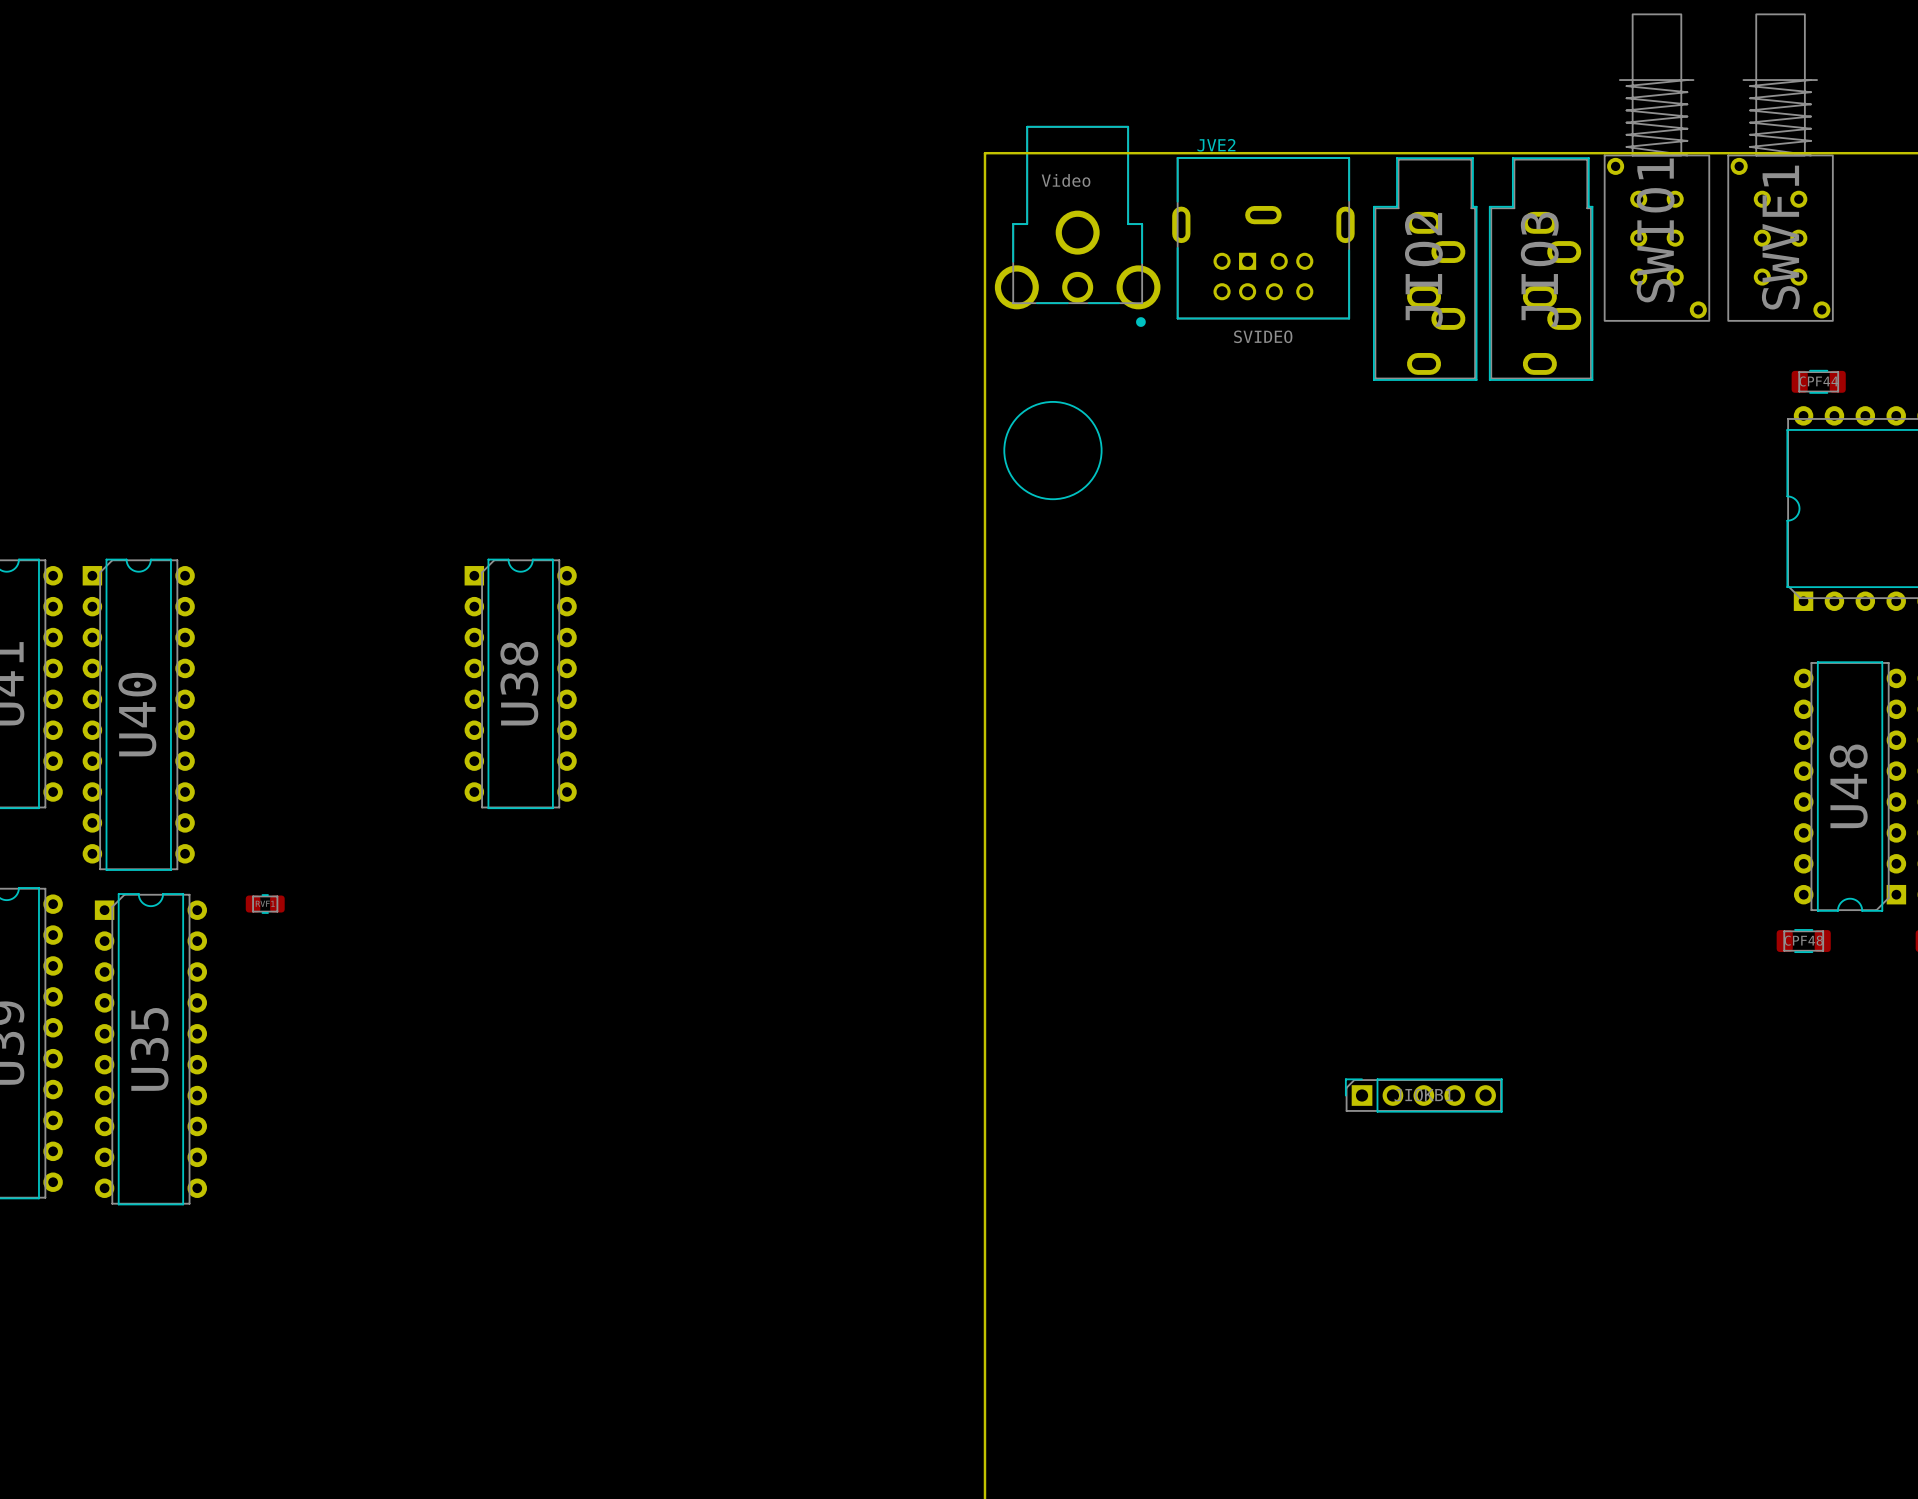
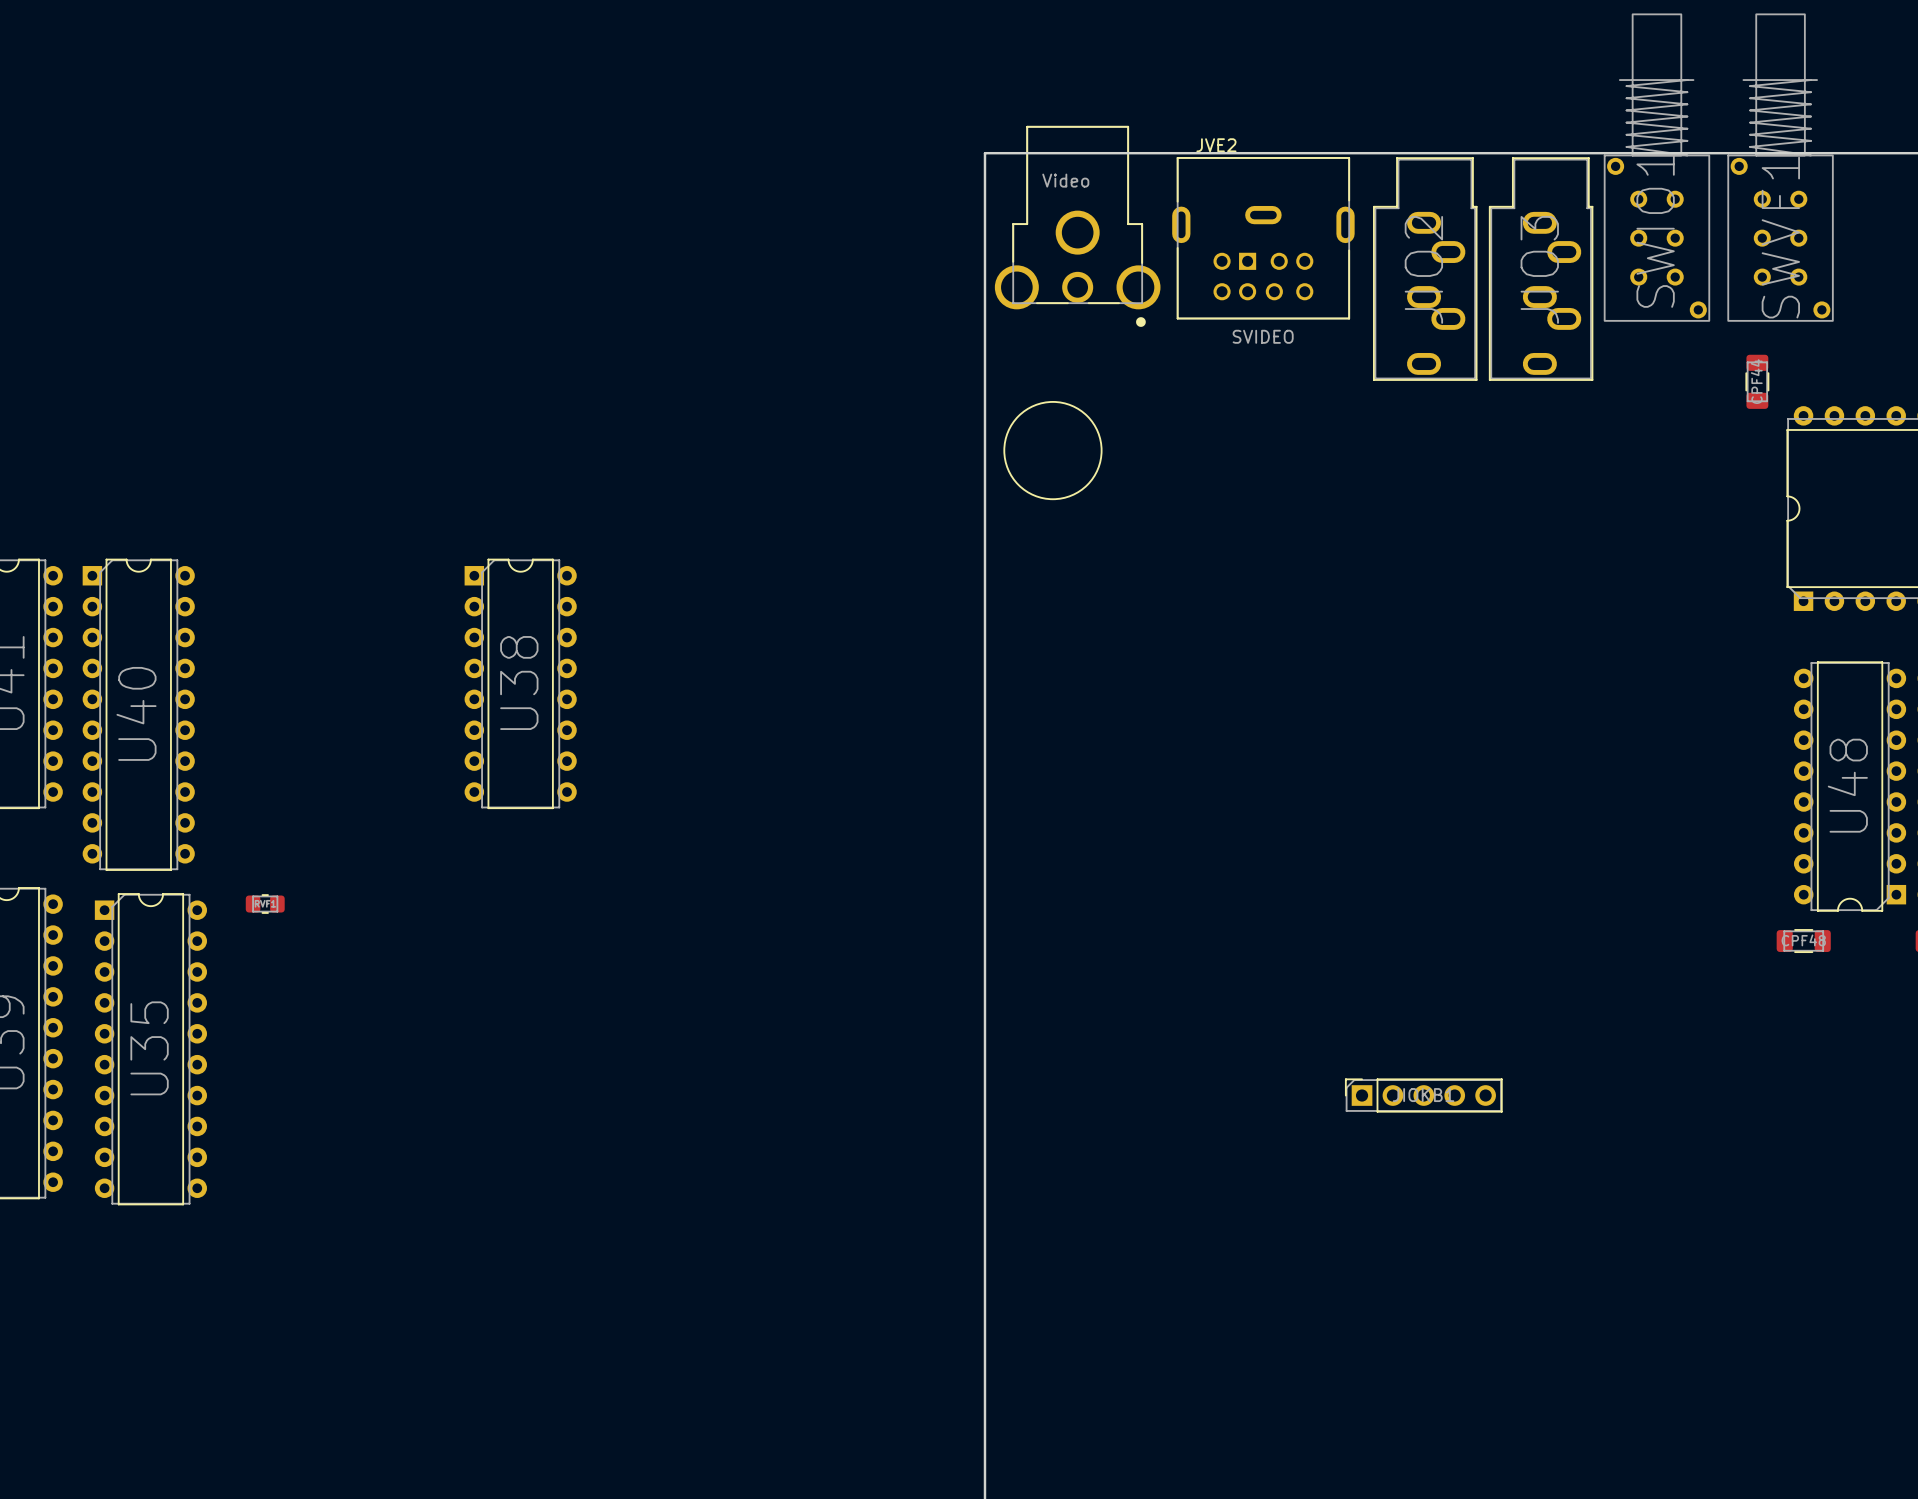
CPF44 rotation: 0° (1818, 381) -> 90° clockwise (1757, 381)
CPF44 position: (1818, 381) -> (1757, 381)

